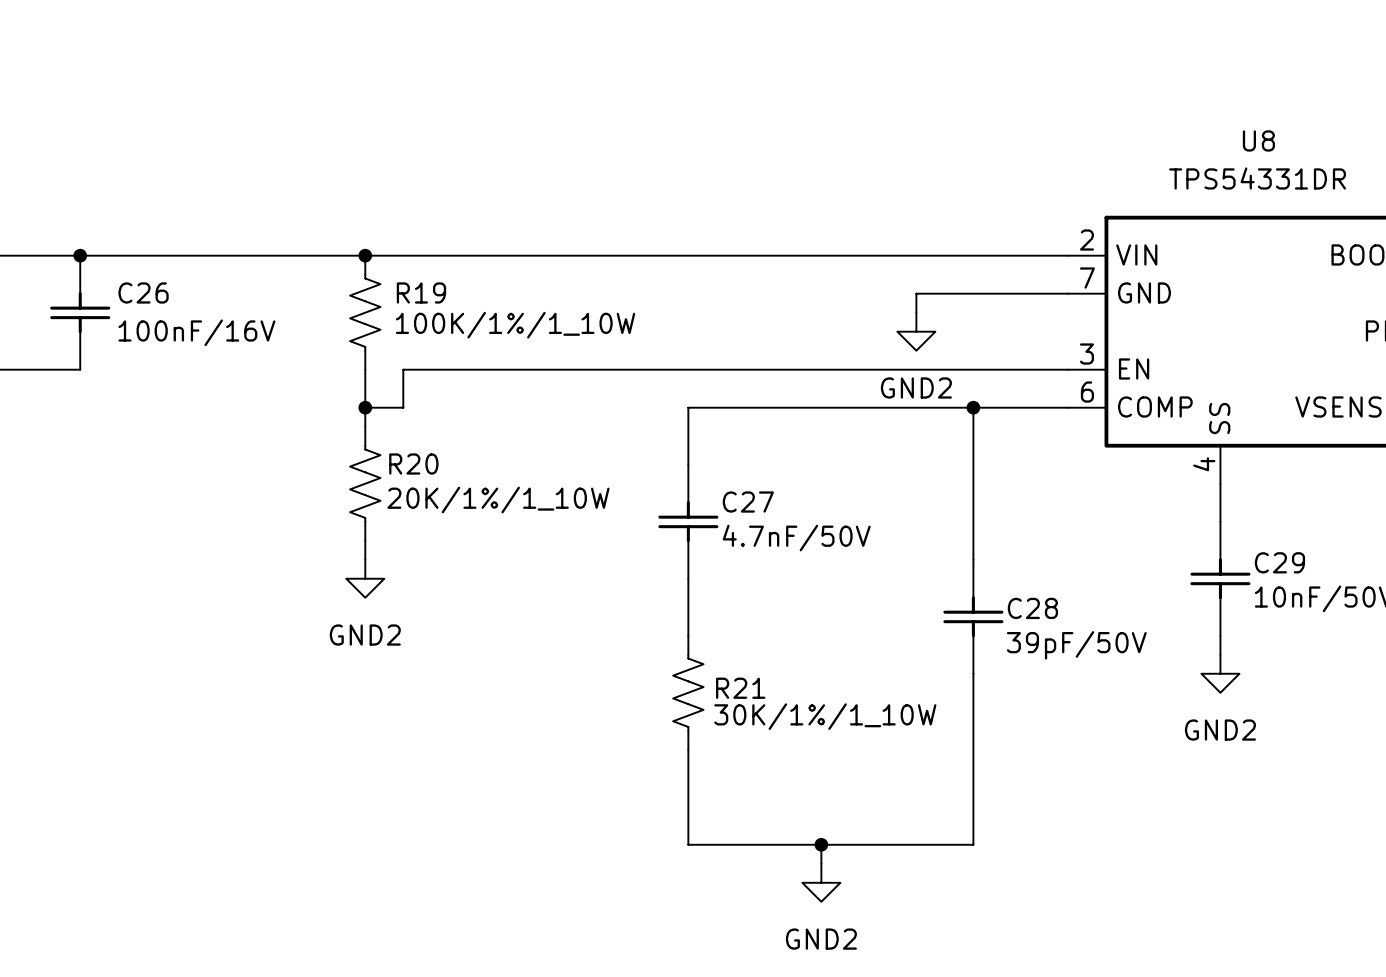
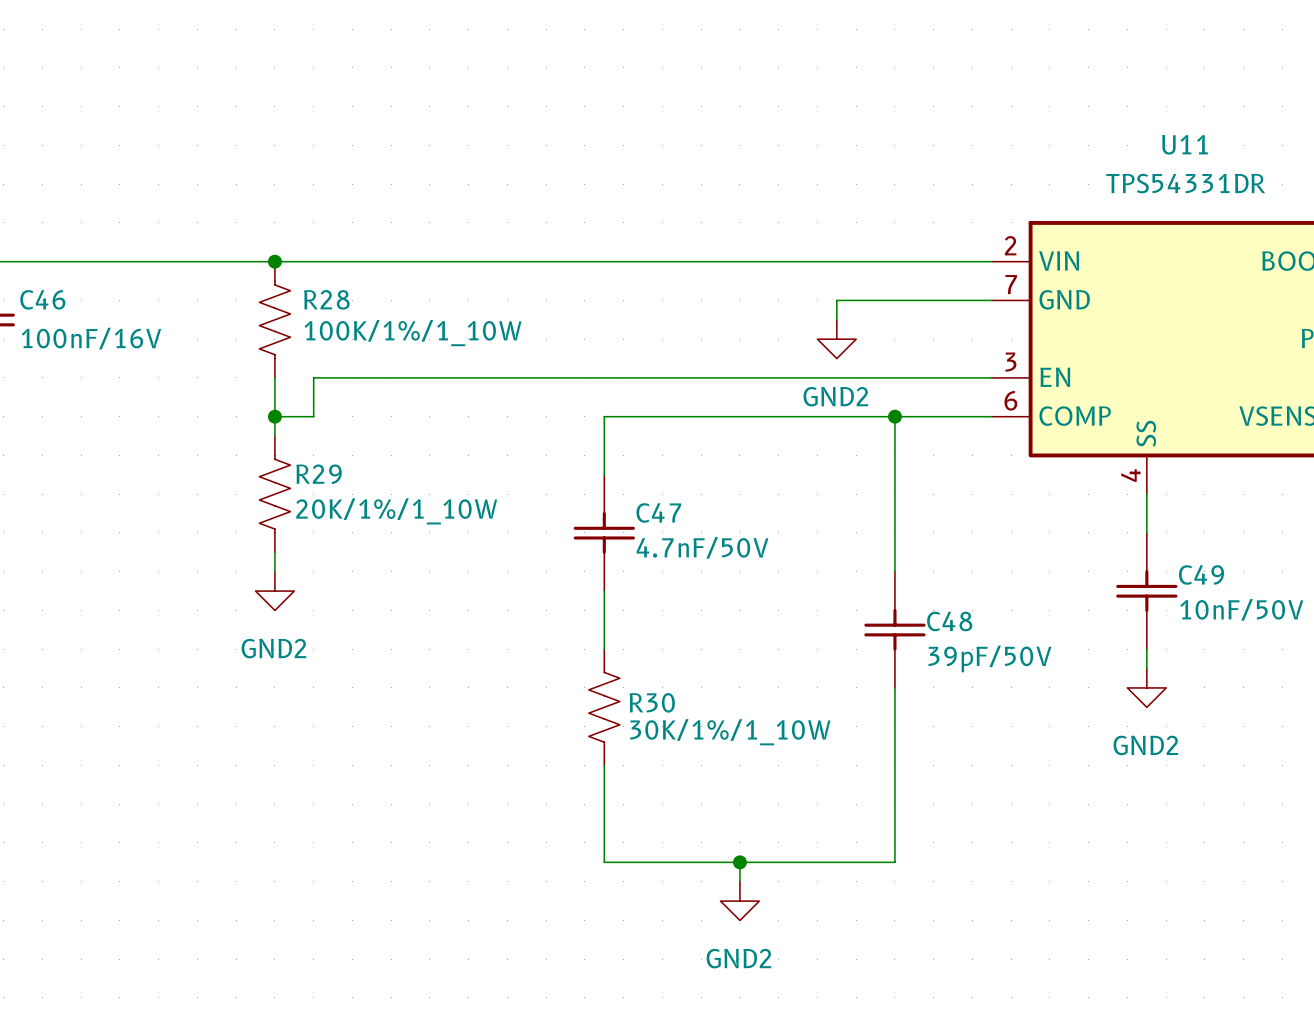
U8 name: U8 (1258, 140) -> U11 (1184, 144)
C26 name: C26 (143, 292) -> C46 (42, 299)
R19 name: R19 (421, 292) -> R28 (326, 299)
R20 name: R20 (413, 464) -> R29 (319, 474)
C27 name: C27 (748, 502) -> C47 (658, 512)
C29 name: C29 (1279, 562) -> C49 (1201, 574)
C28 name: C28 (1032, 608) -> C48 (949, 621)
R21 name: R21 (740, 688) -> R30 (652, 702)

